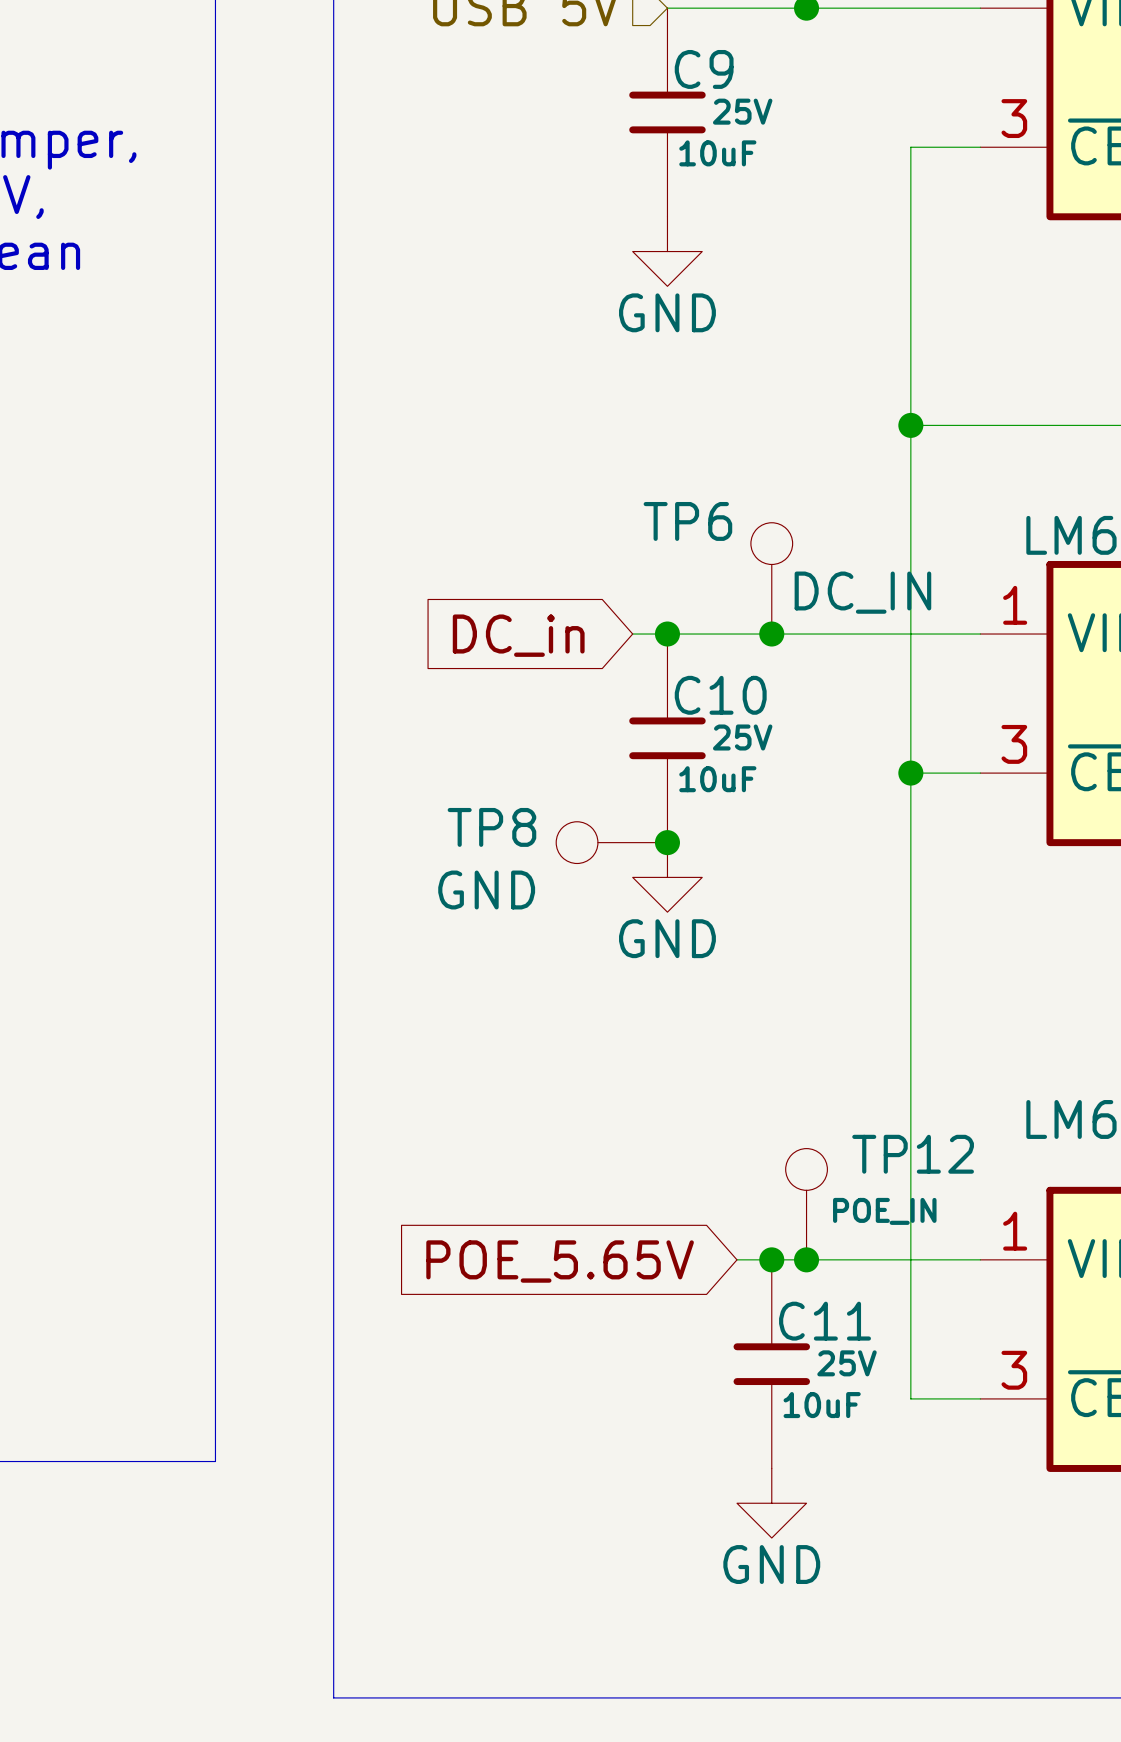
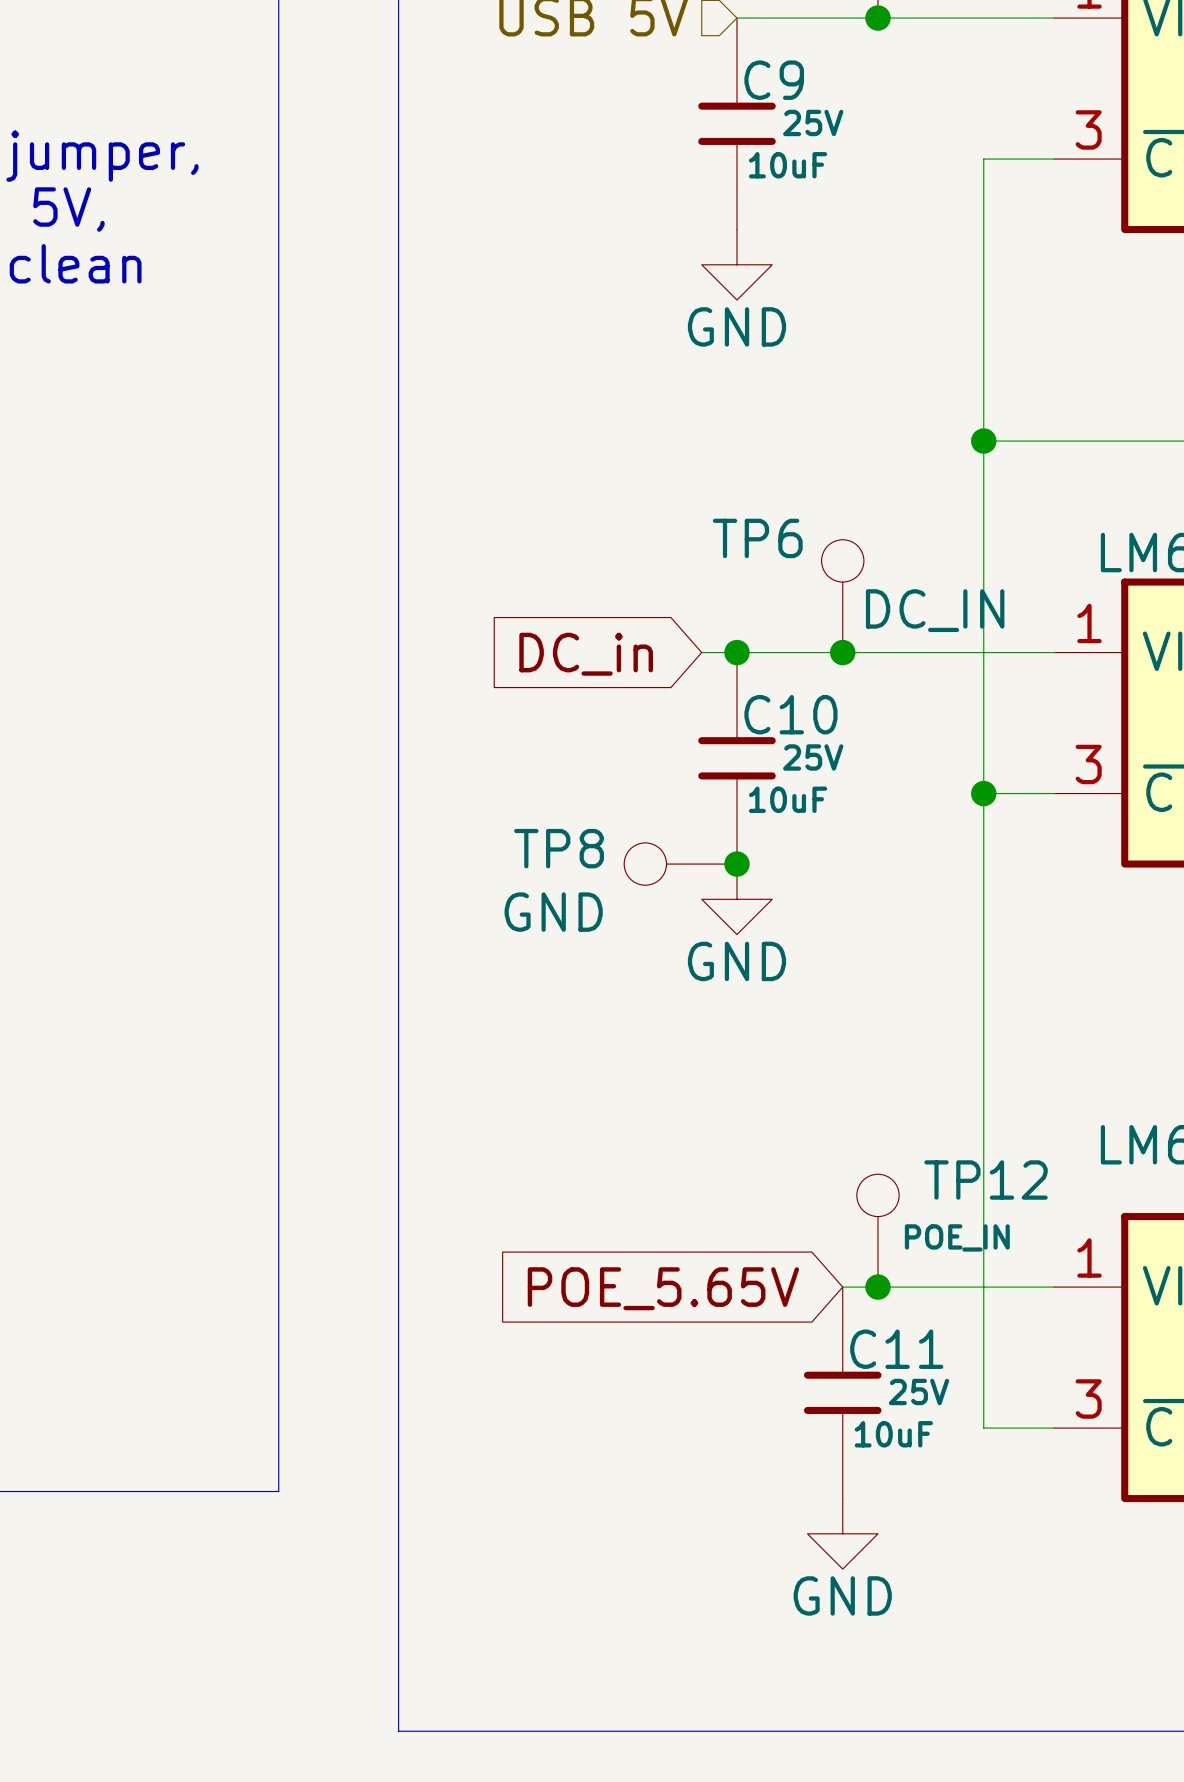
wire: (737, 1259) (771, 1259) -> none
junction: (771, 1259) -> none
global label position: POE_5.65V (560, 1261) -> POE_5.65V (663, 1288)

